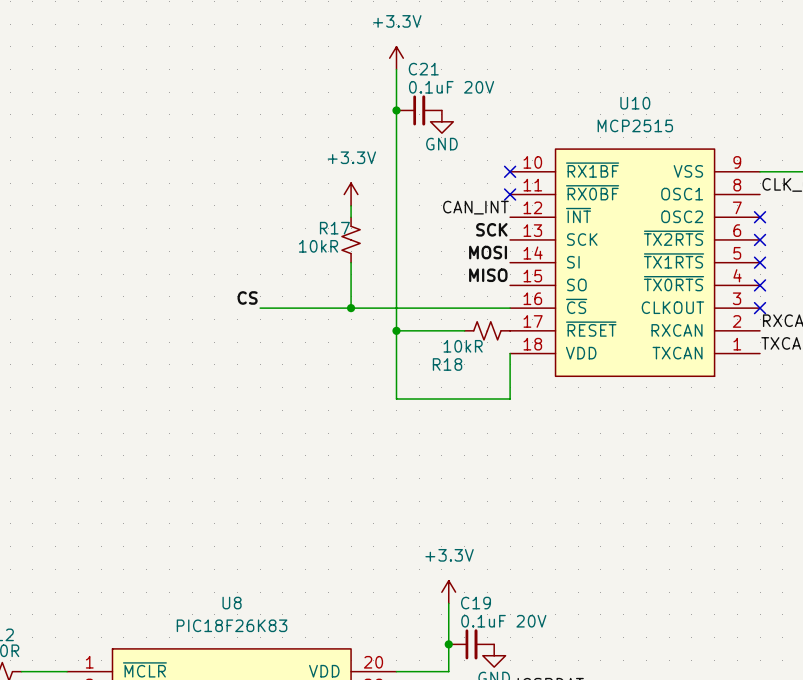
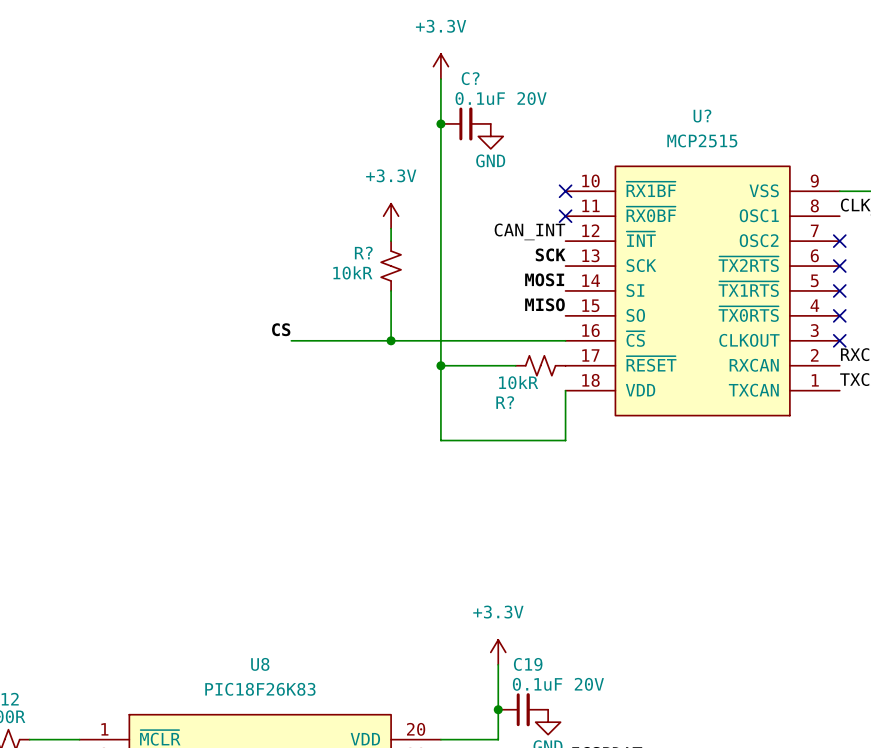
C21 name: C21 (423, 69) -> C? (470, 78)
U10 name: U10 (635, 103) -> U? (702, 116)
R17 name: R17 (334, 228) -> R? (363, 253)
R18 name: R18 (447, 364) -> R? (505, 402)

